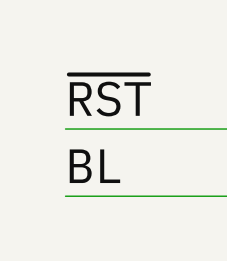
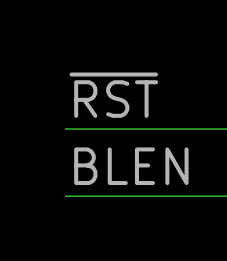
label: BL (94, 166) -> BLEN (131, 166)

